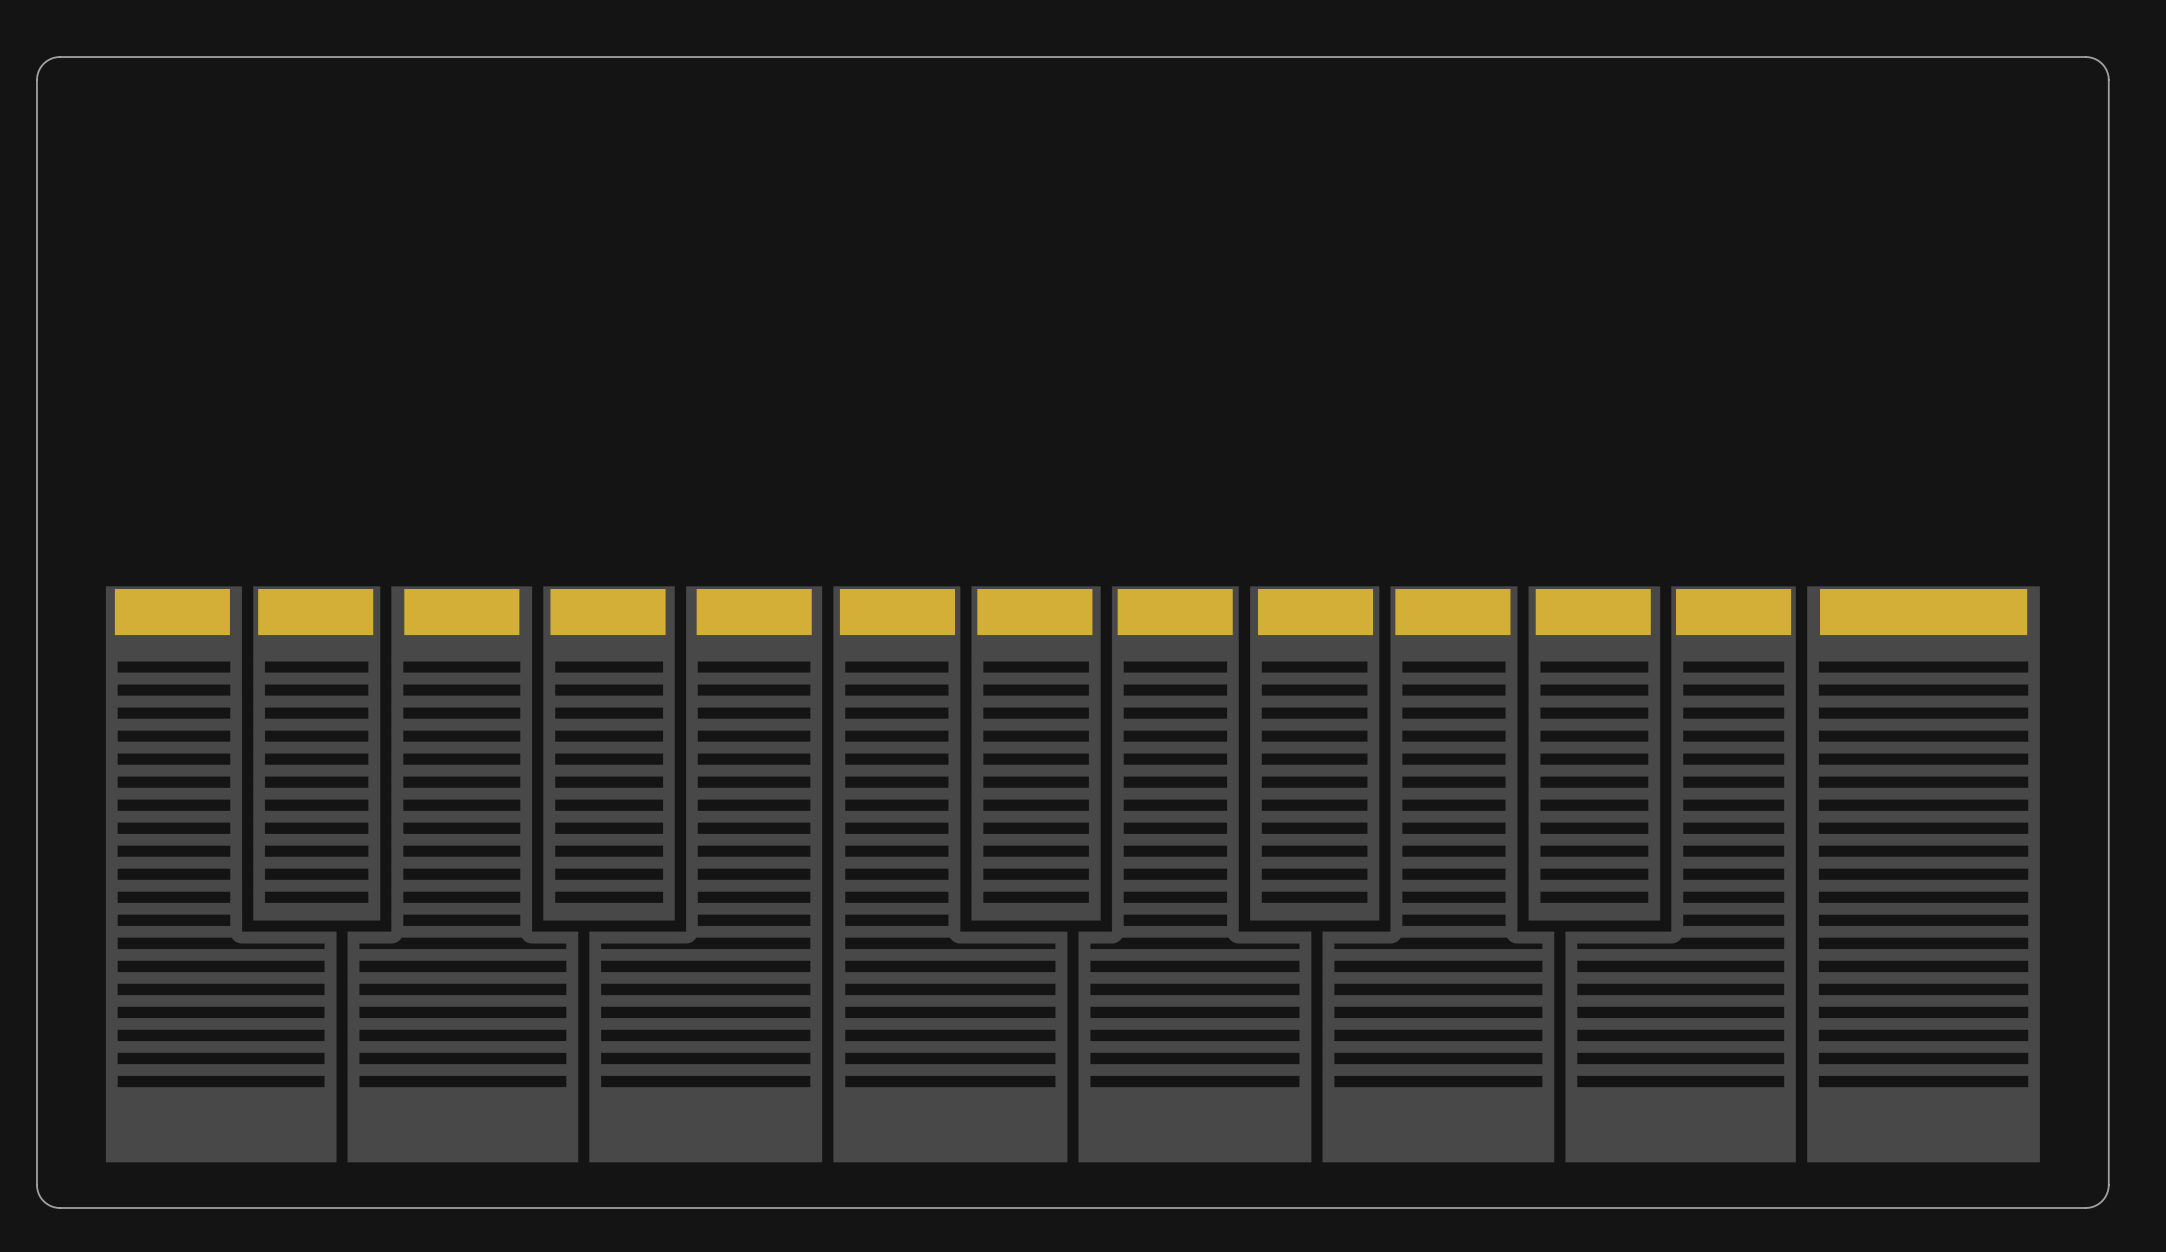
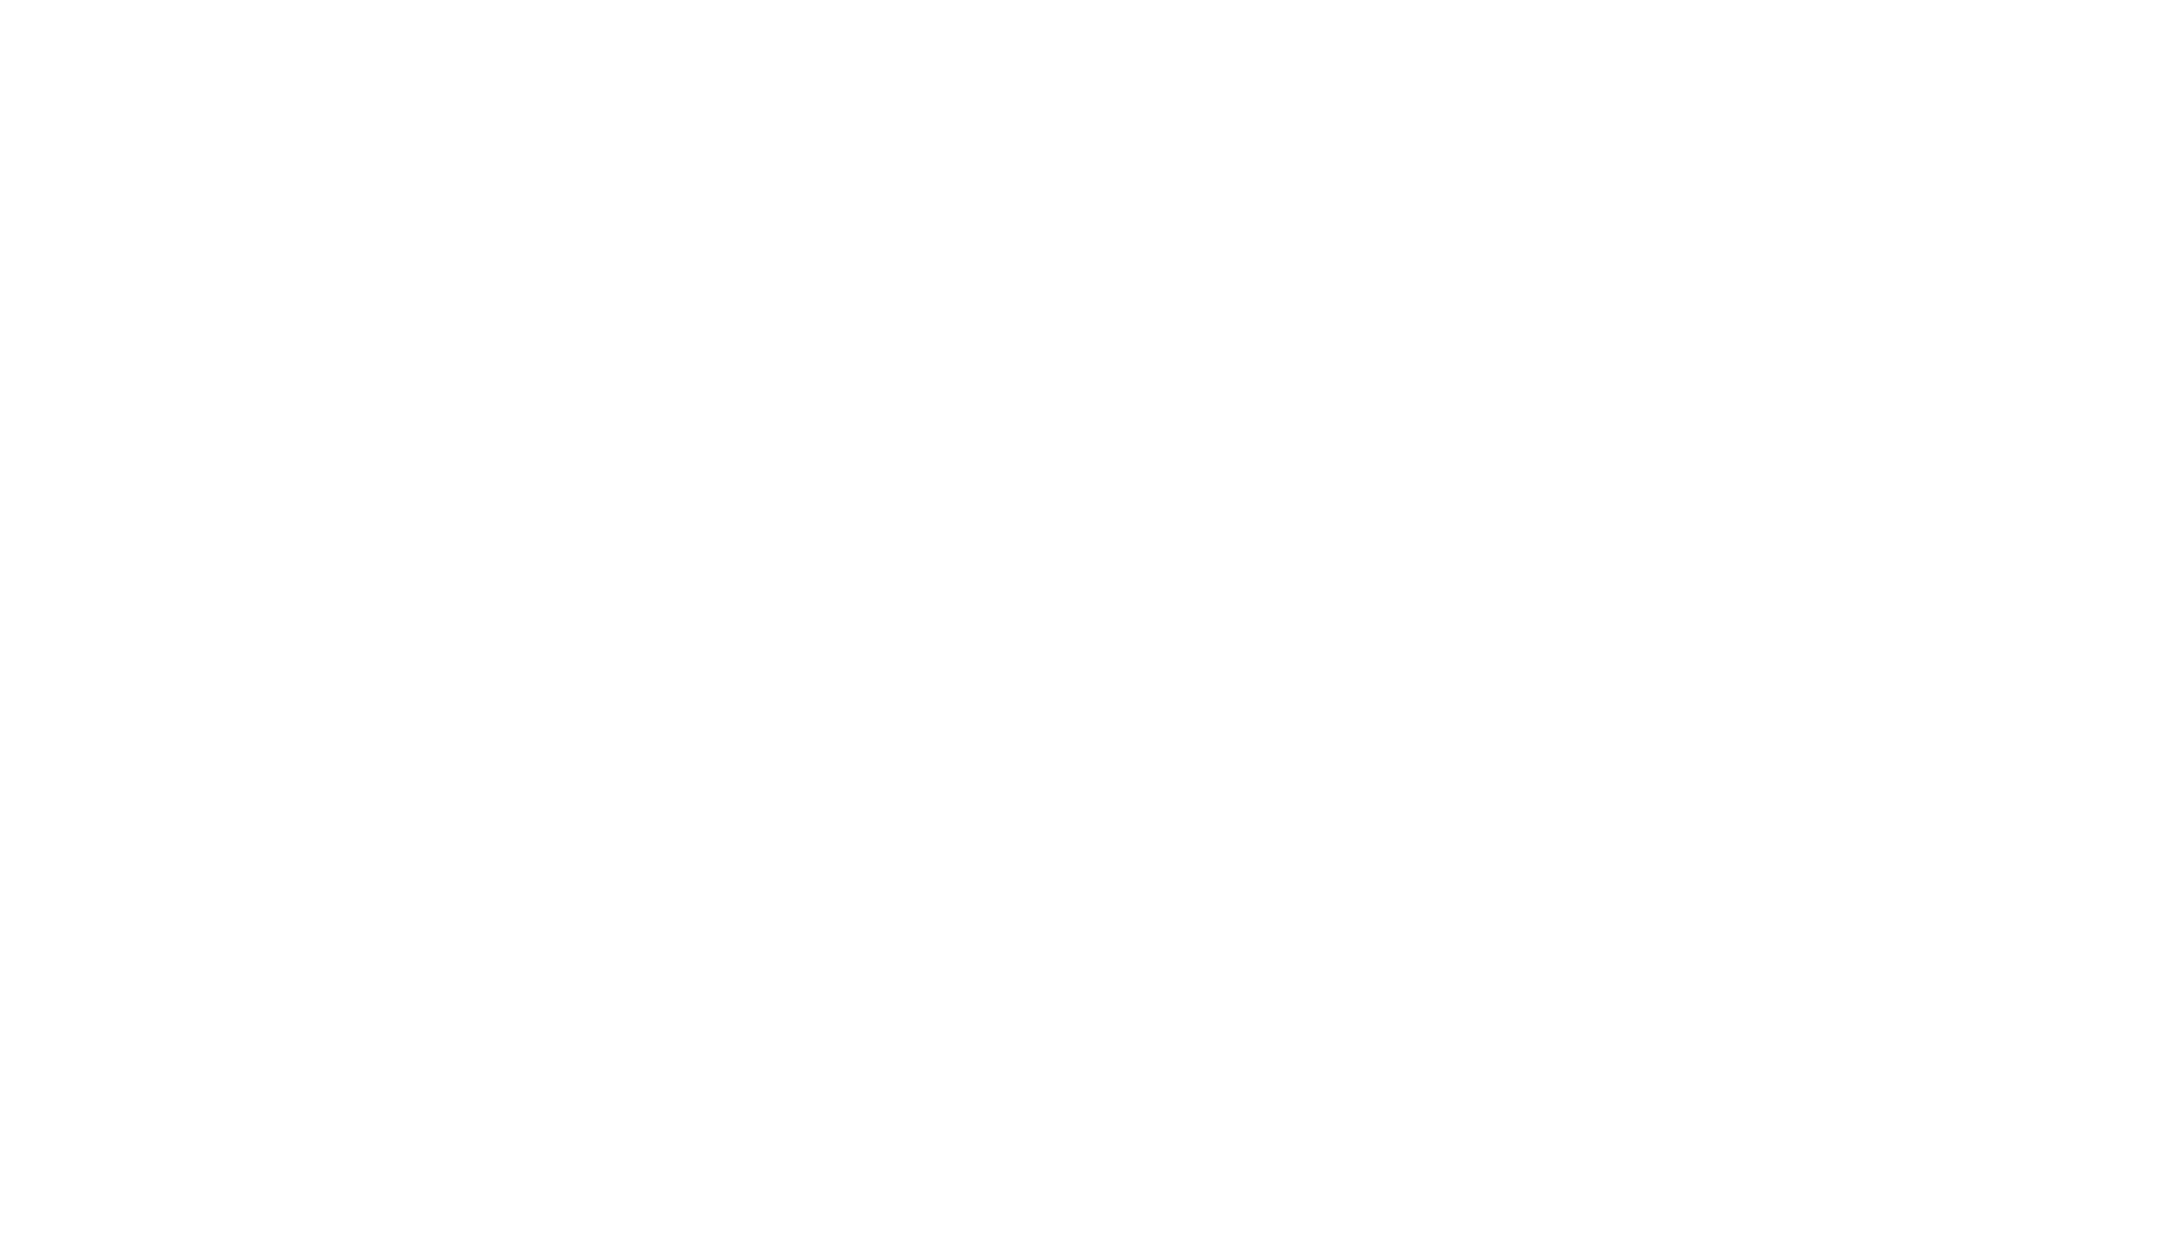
board edge: (59, 57) (2085, 57) (2097, 60) (2105, 68) (2108, 80) (2108, 1184) (2105, 1196) (2097, 1204) (2085, 1208) (59, 1208) (48, 1204) (40, 1196) (36, 1184) (36, 80) (38, 71) (43, 63) (51, 58) (59, 57) -> none
part: (1072, 874) -> none

